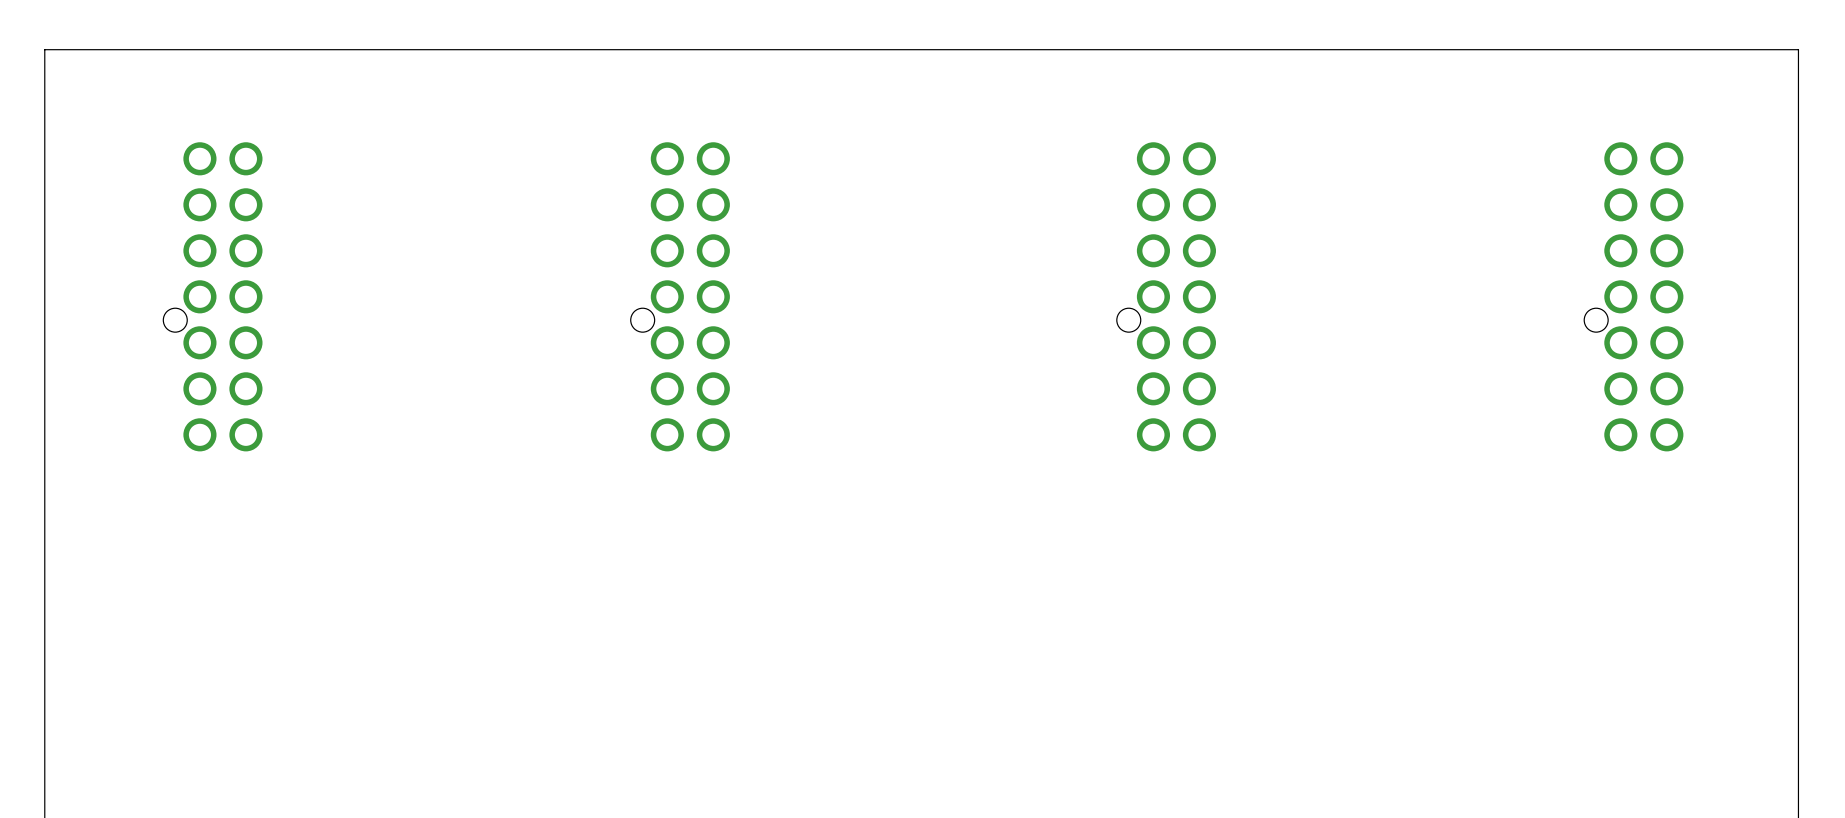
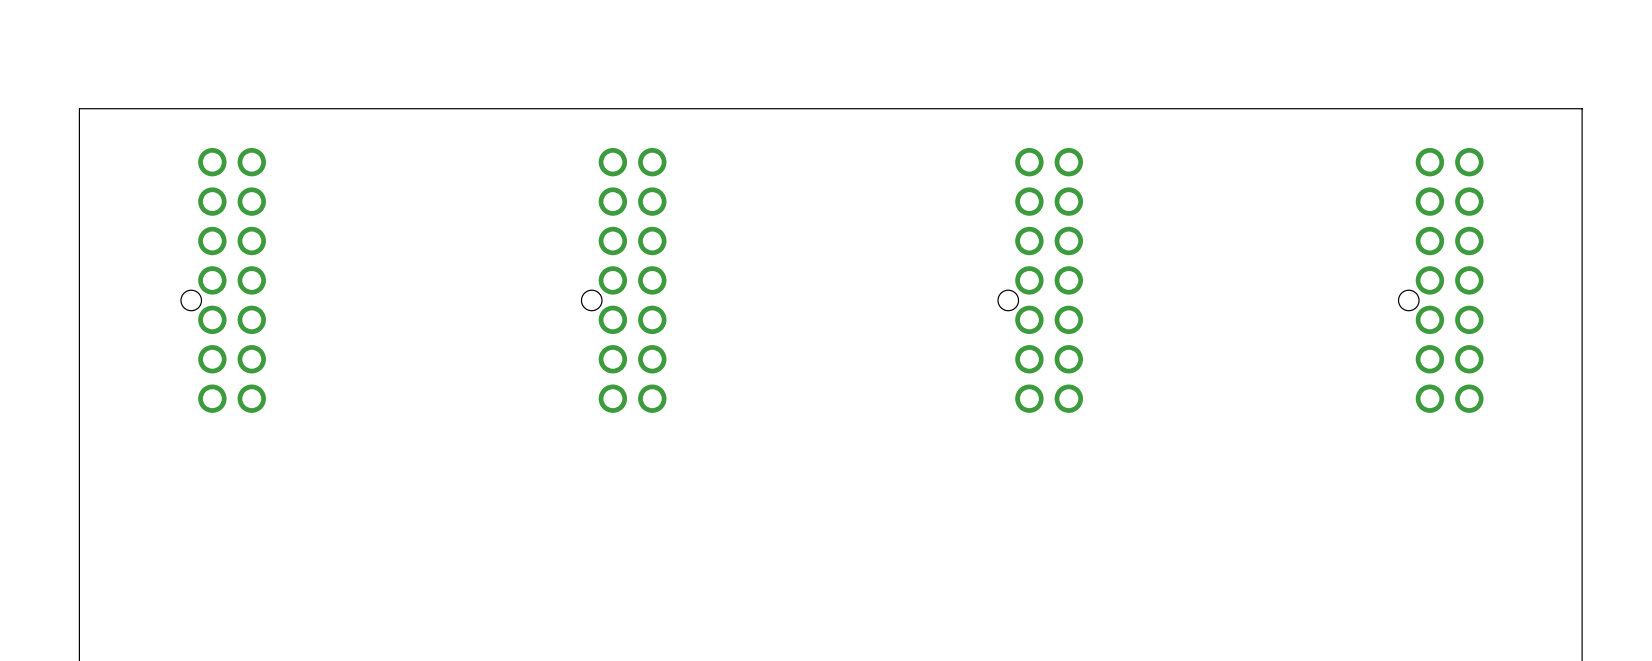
board edge: (1798, 96) (1798, 49) (44, 49) (44, 96) -> (1582, 108) (79, 108)

